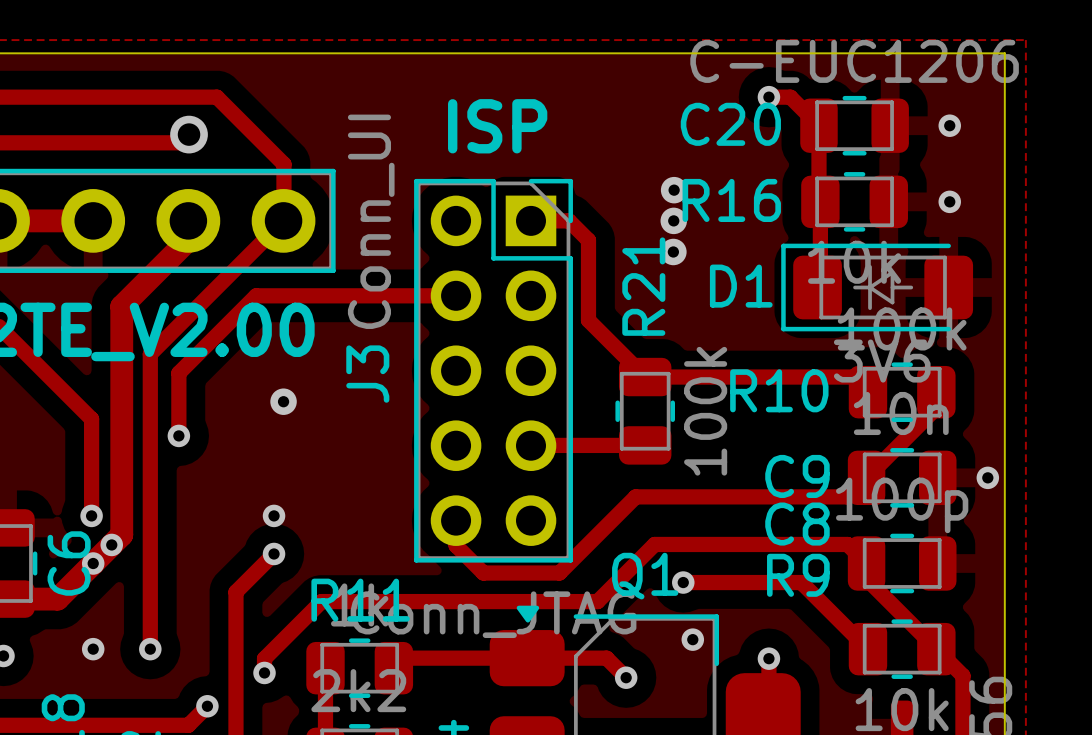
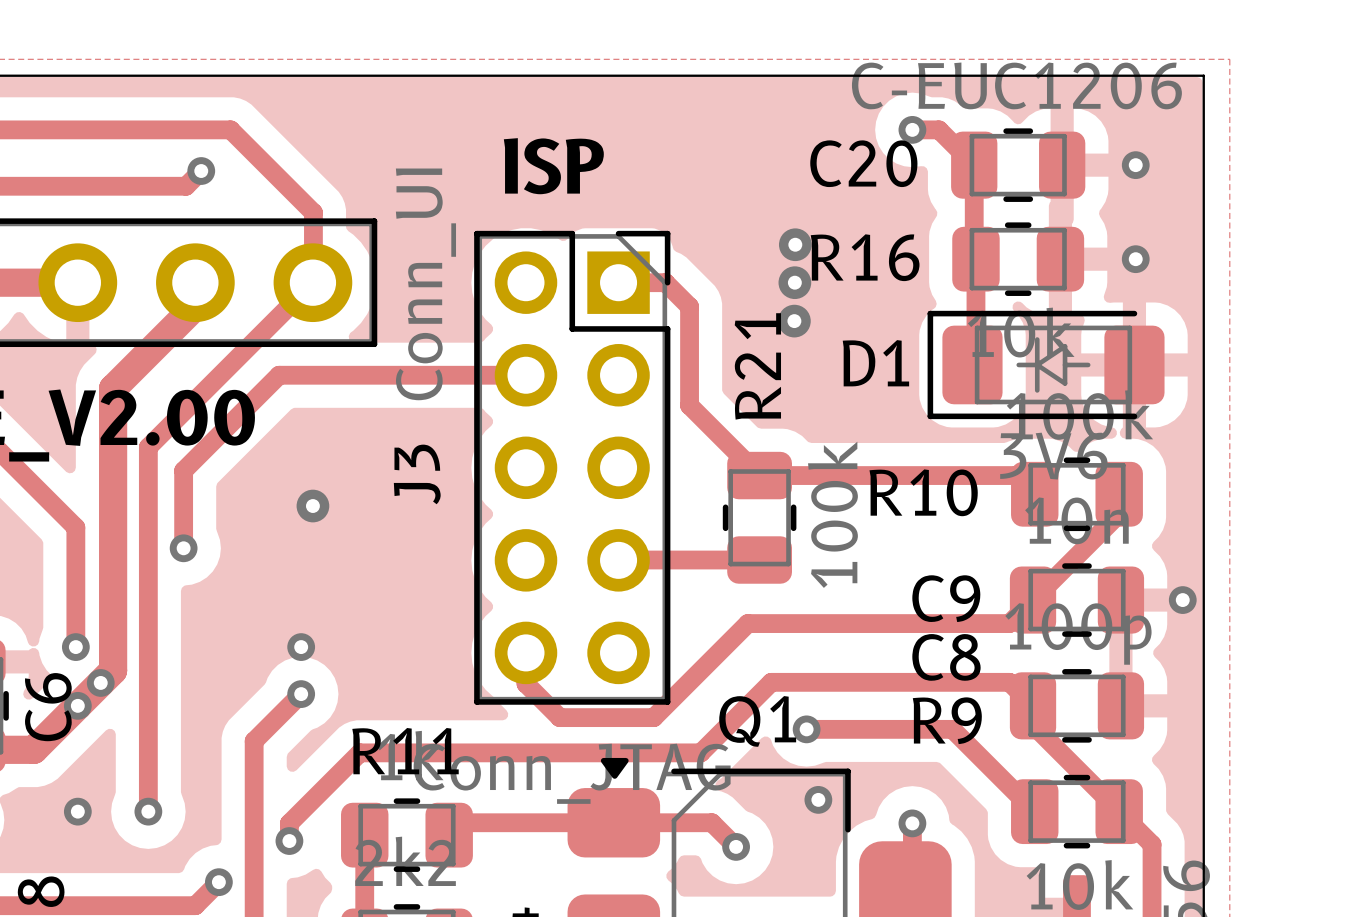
via size: [170, 115, 208, 154] -> [187, 157, 216, 185]

